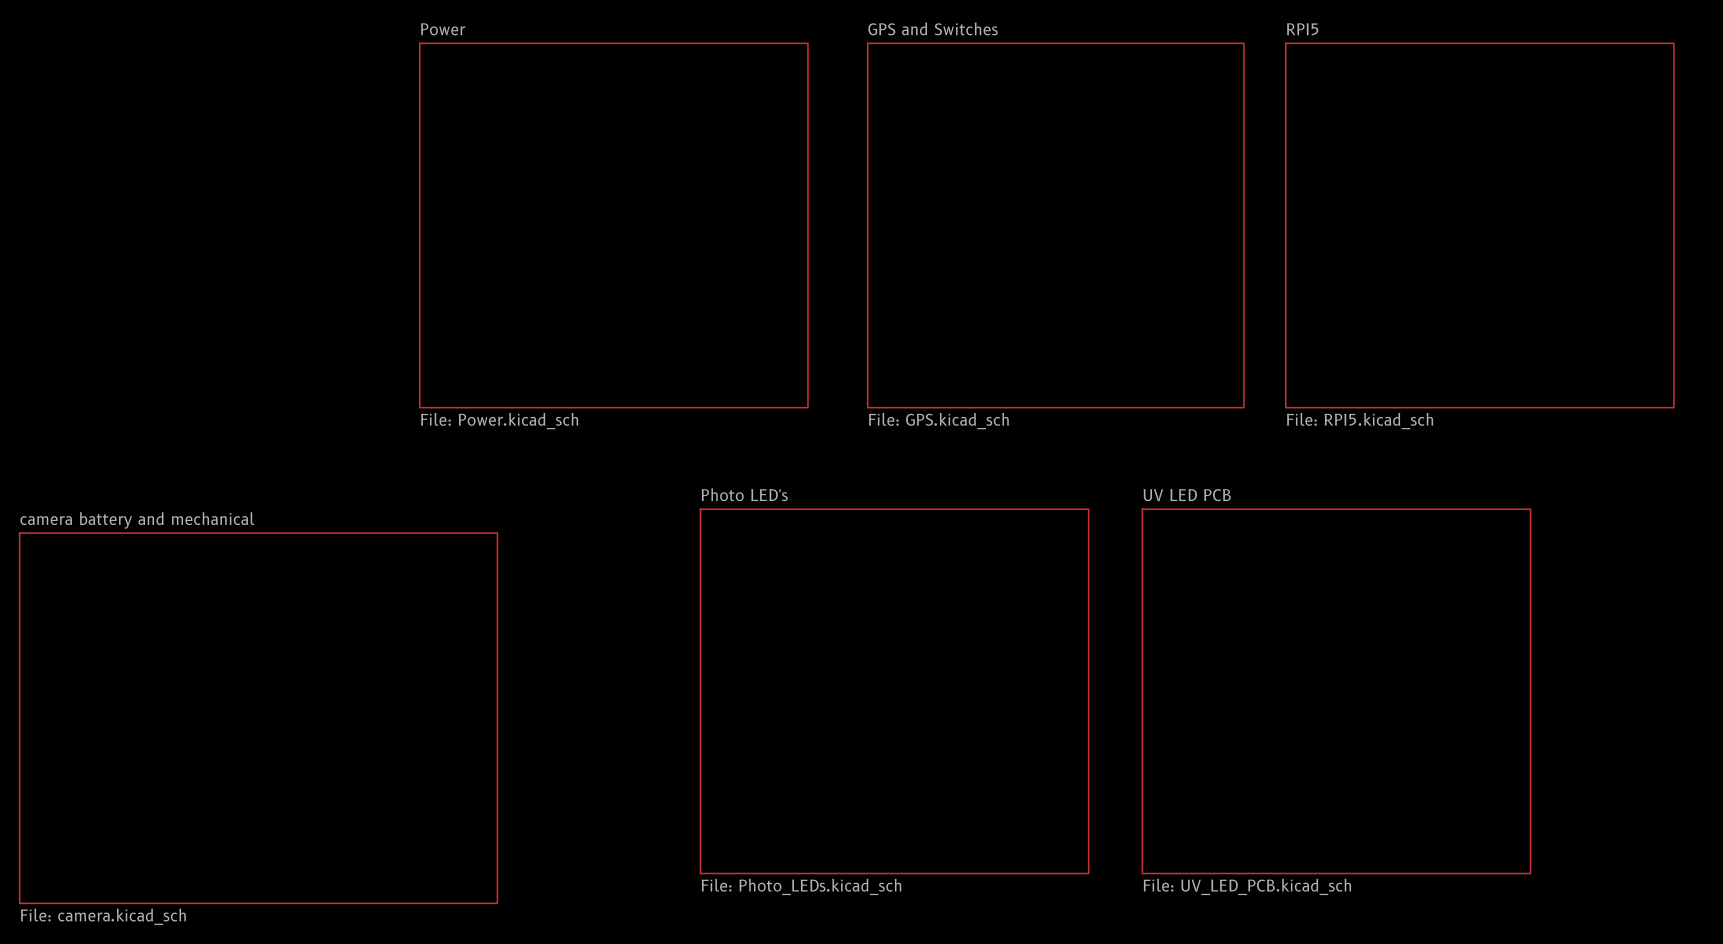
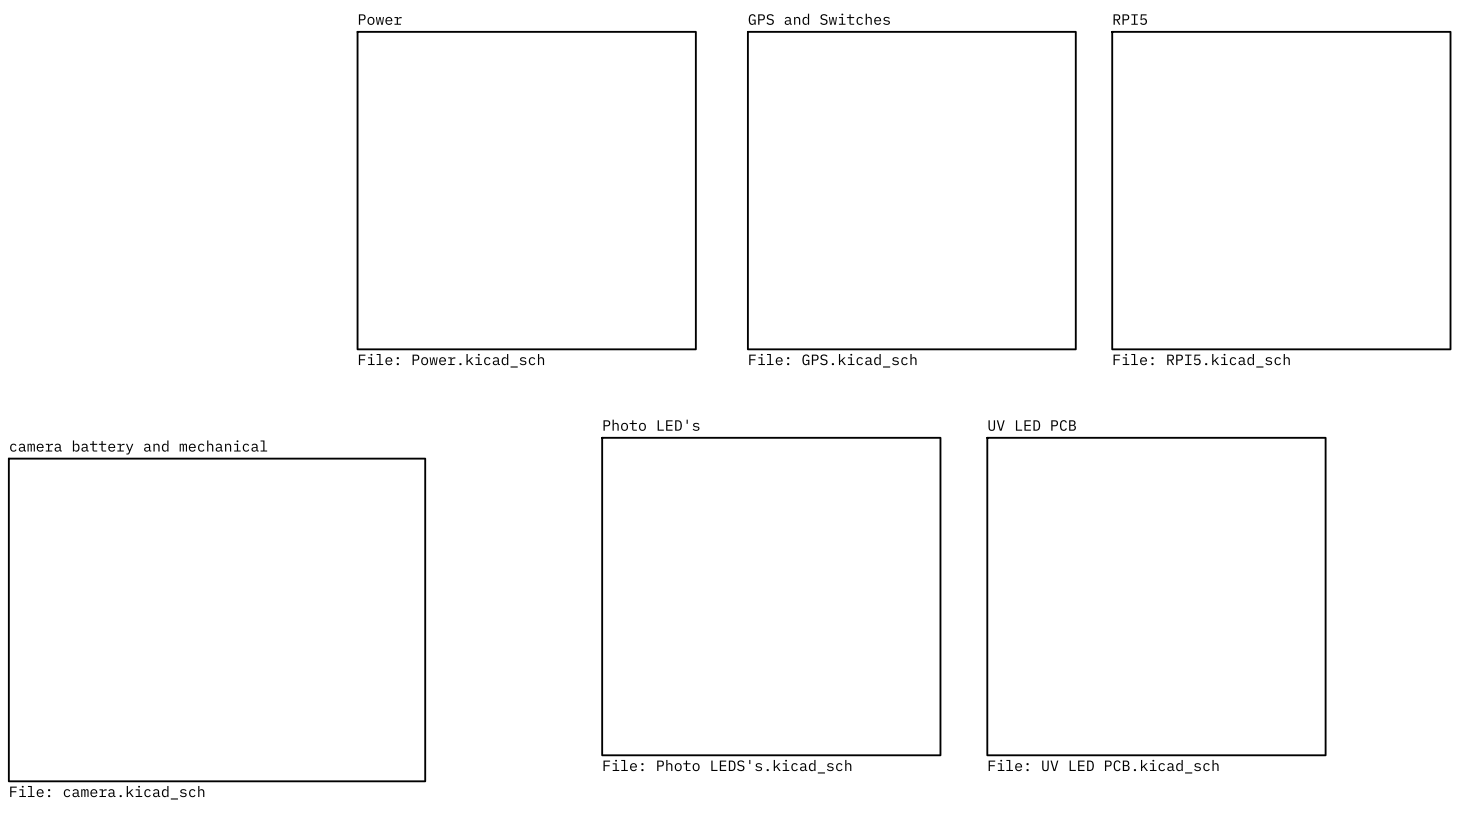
sheet Photo LED's value: File: Photo_LEDs.kicad_sch (801, 886) -> File: Photo LEDS's.kicad_sch (727, 766)
sheet UV LED PCB value: File: UV_LED_PCB.kicad_sch (1247, 886) -> File: UV LED PCB.kicad_sch (1103, 766)

